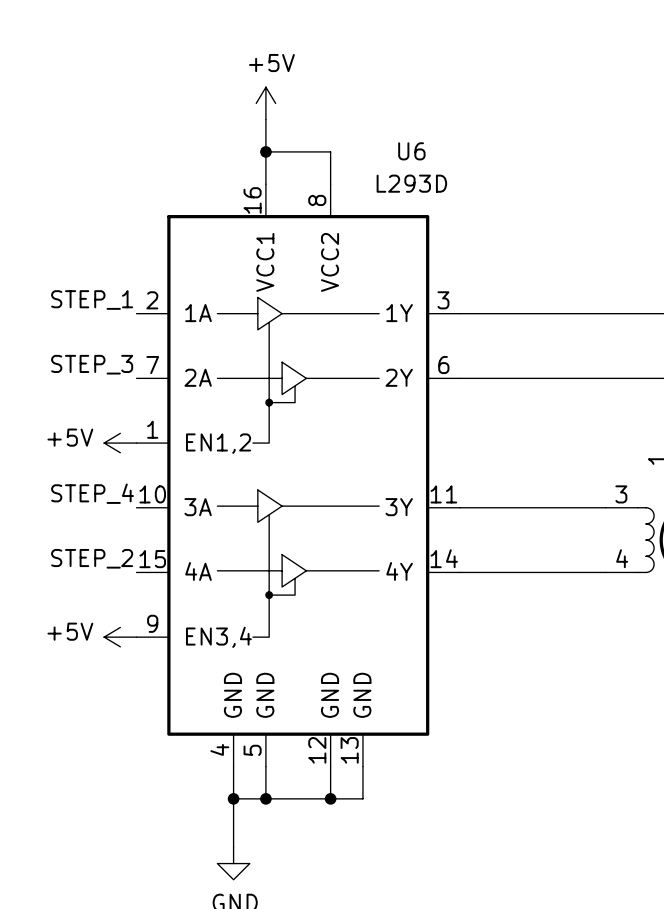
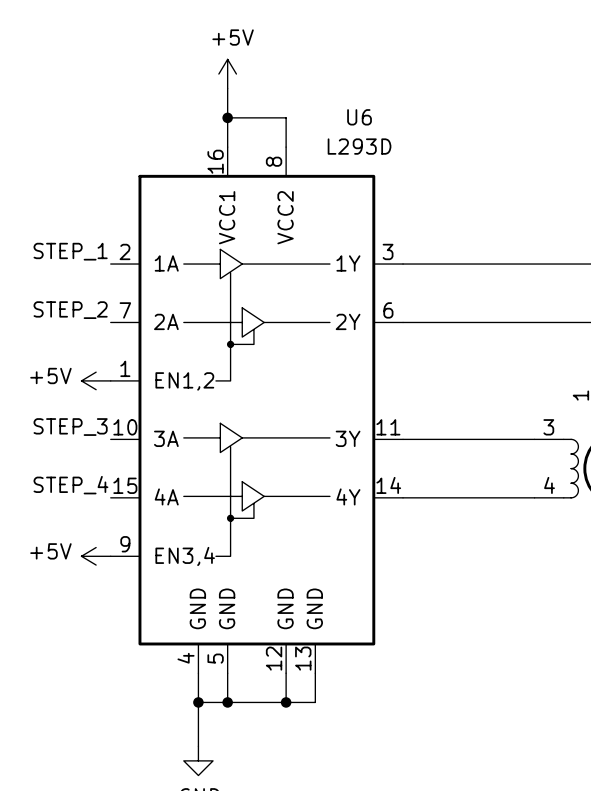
label: STEP_3 (92, 364) -> STEP_2 (70, 310)
label: STEP_4 (92, 493) -> STEP_3 (70, 427)
label: STEP_2 (92, 558) -> STEP_4 (70, 485)

